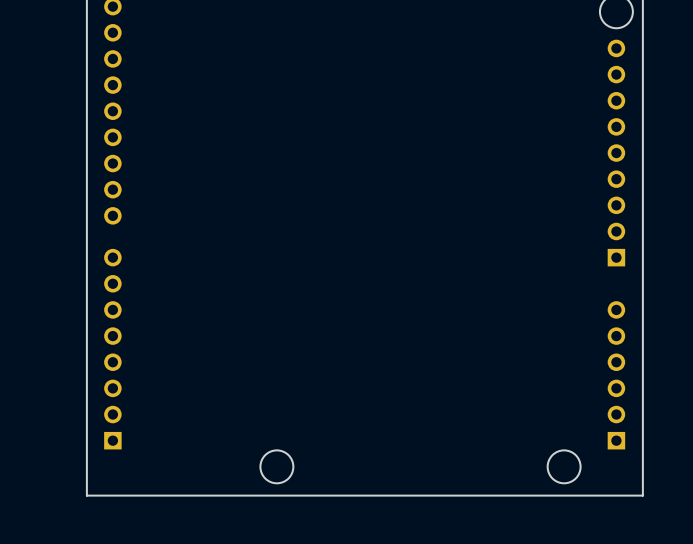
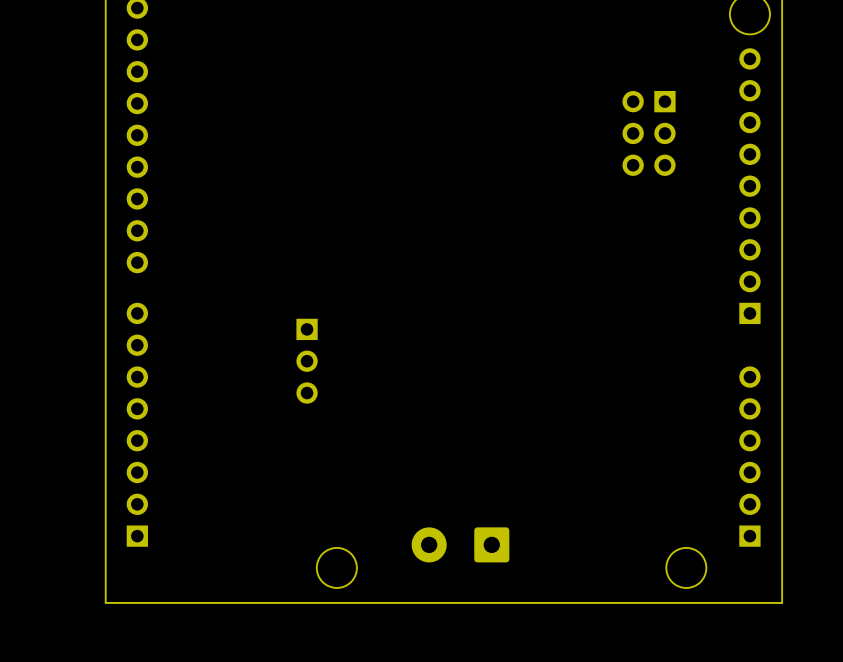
part: none -> (649, 133)
part: none -> (307, 361)
part: none -> (460, 544)

